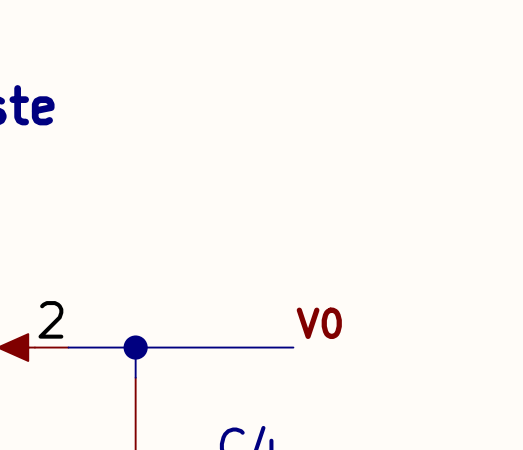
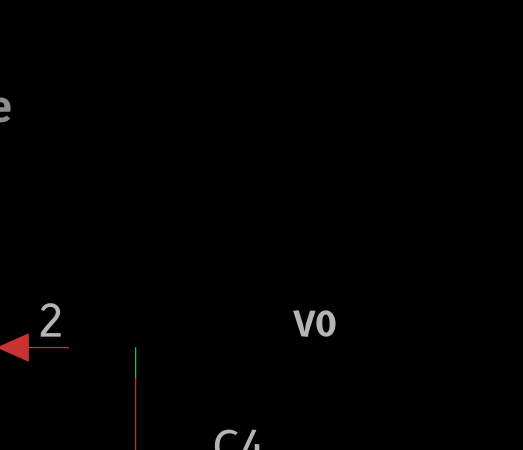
wire: (68, 347) (293, 347) -> none
junction: (135, 347) -> none

